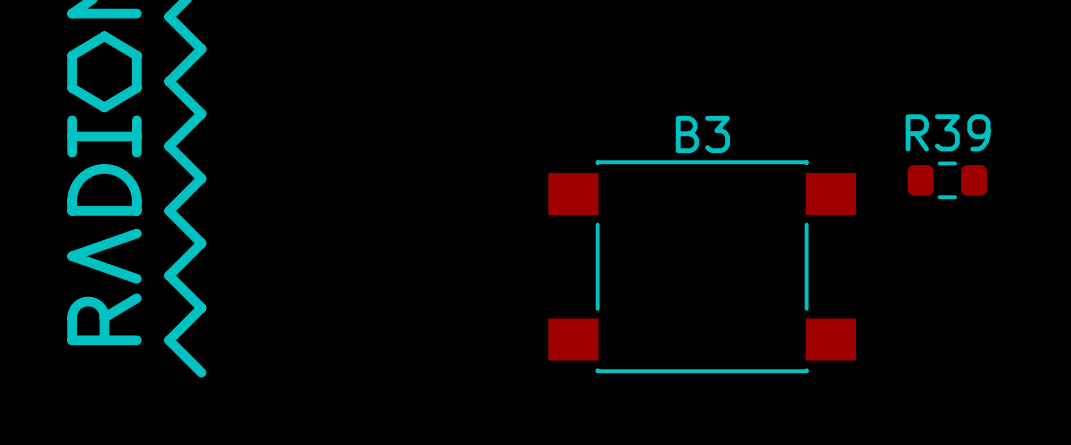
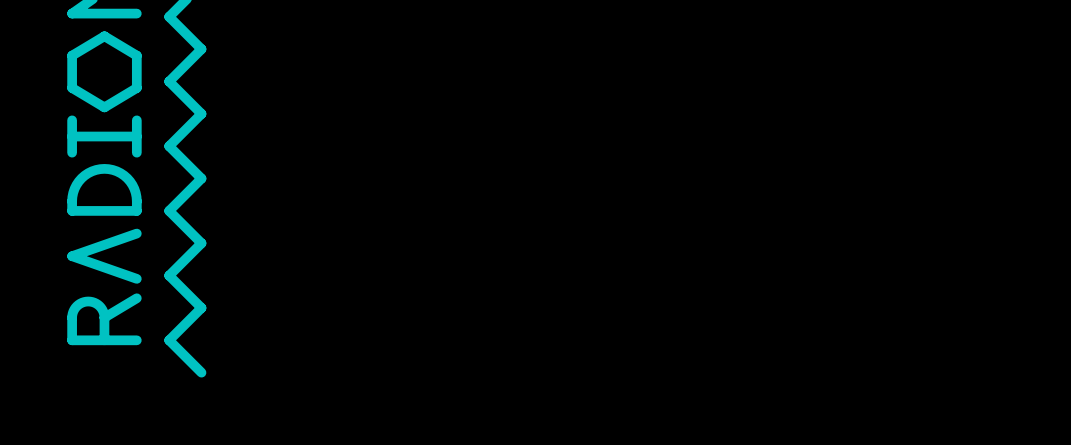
R39: (947, 180) -> none
B3: (702, 266) -> none

